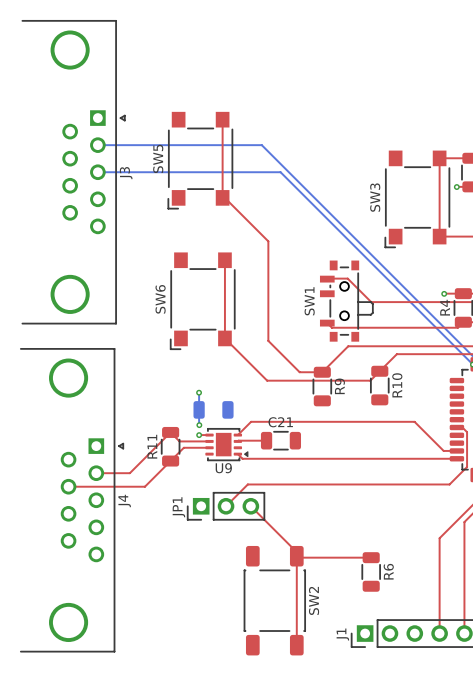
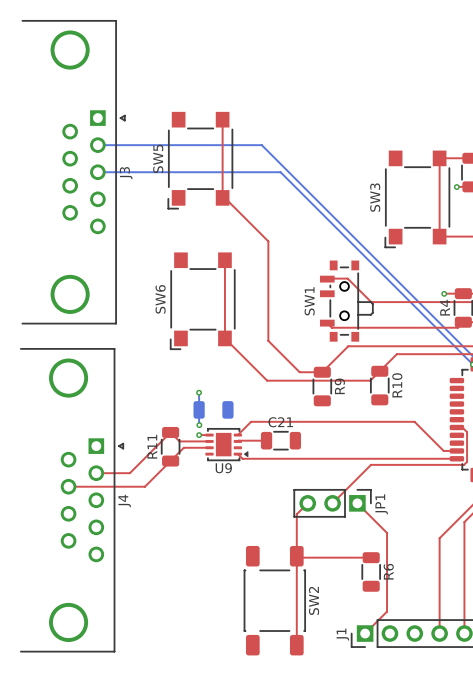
top track: (467, 461) (467, 466) (449, 484) (247, 484) (226, 506) -> (467, 461) (464, 464) (371, 464) (332, 503)
top track: none -> (357, 503) (387, 532) (387, 611) (365, 633)
JP1 rotation: 0° (226, 506) -> 180° (332, 503)
JP1 position: (226, 506) -> (332, 503)
top track: (250, 506) (296, 552) -> (307, 503) (296, 514) (296, 552)

